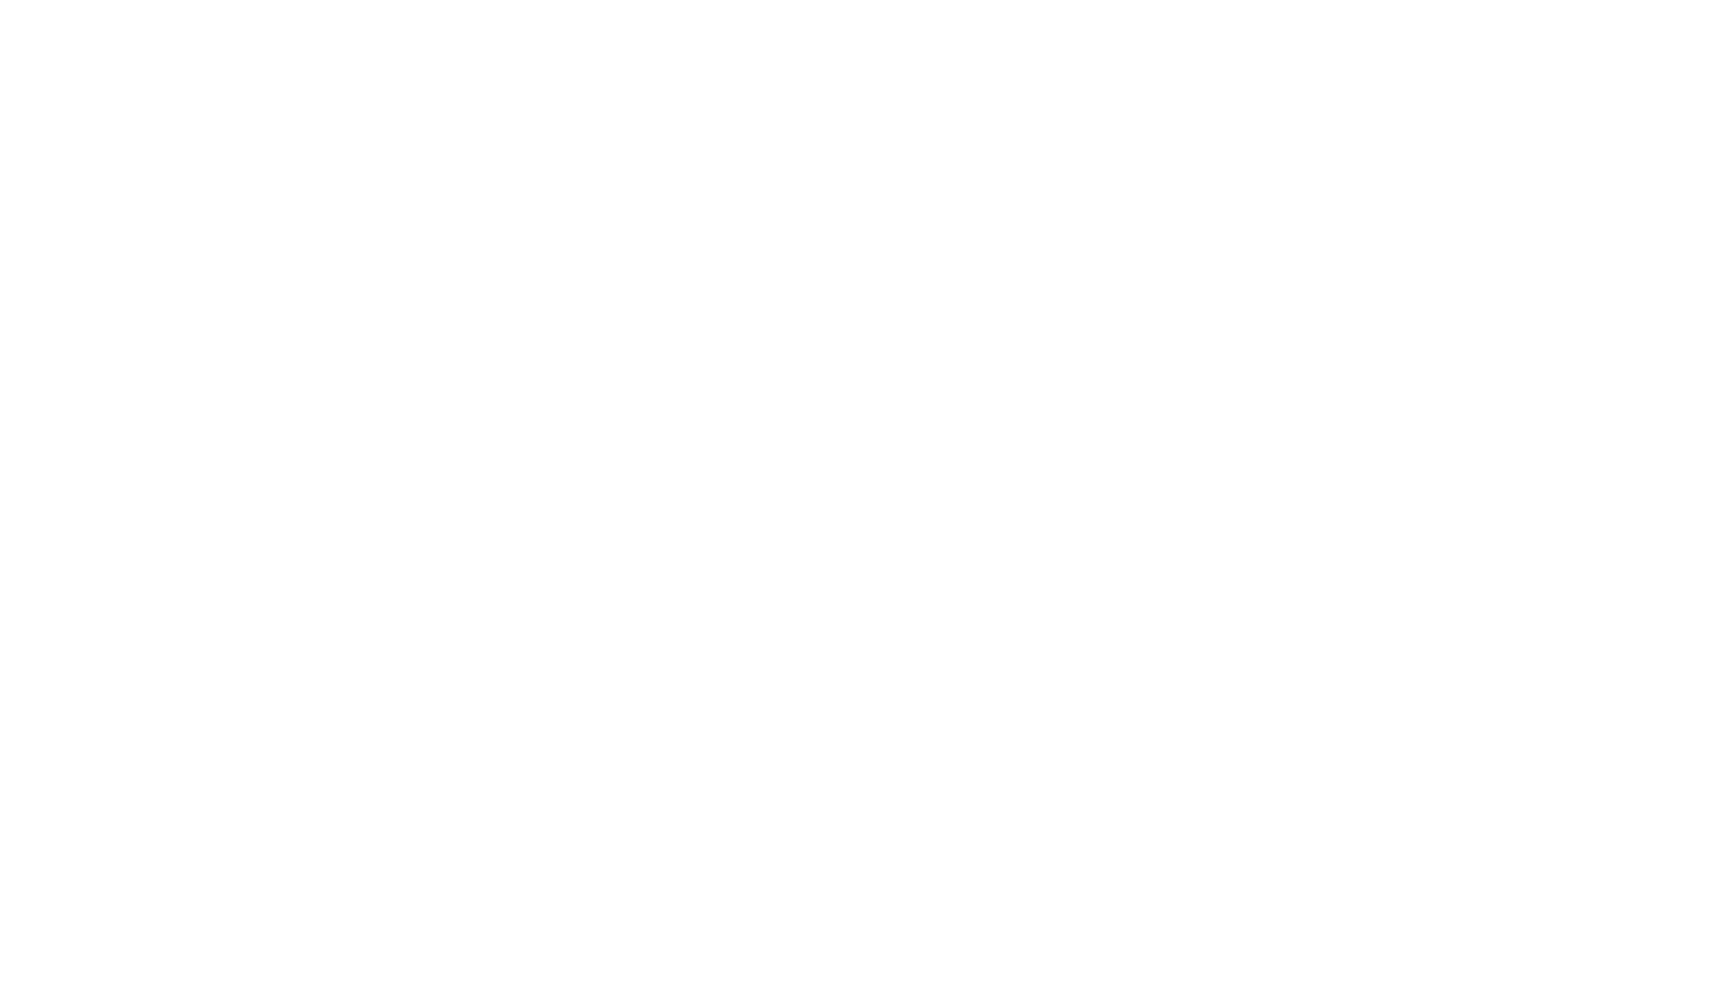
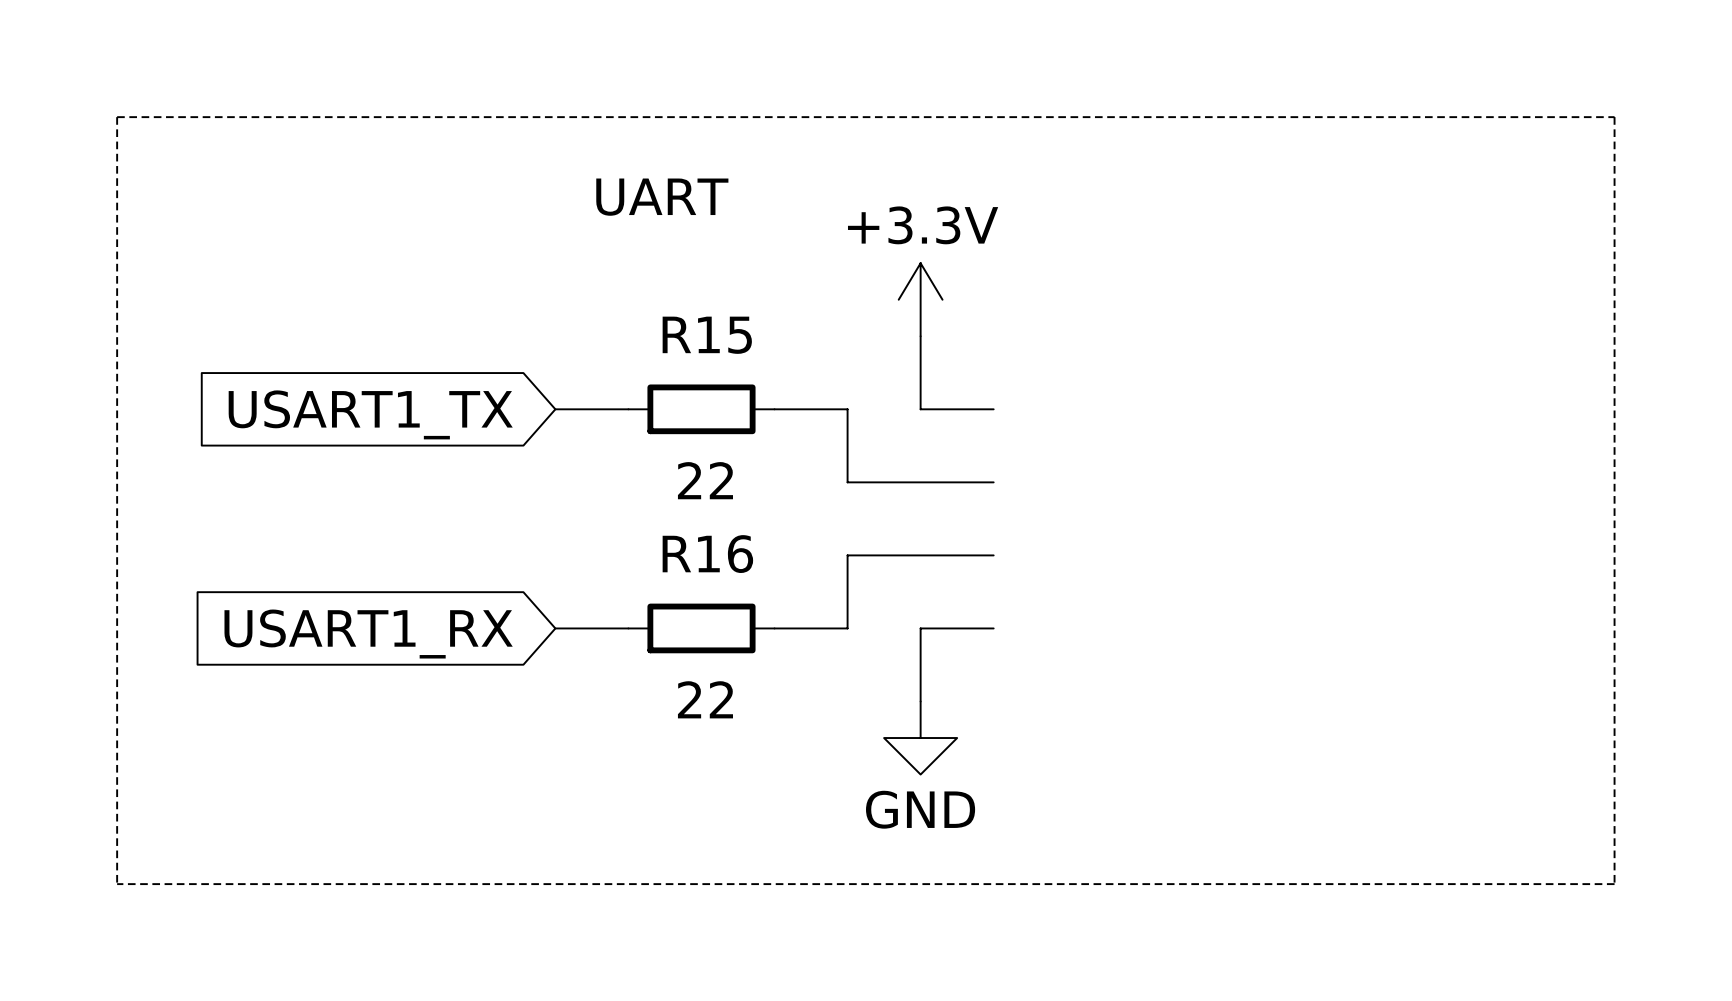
line: none -> (117, 117) (1614, 117) (1614, 884) (117, 884) (117, 117)
text: none -> UART (662, 197)
power symbol: none -> +3.3V (920, 299)
wire: none -> (920, 336) (920, 409) (993, 409)
wire: none -> (555, 409) (628, 409)
R15: none -> 22 (701, 409)
wire: none -> (774, 409) (847, 409) (847, 482) (993, 482)
global label: none -> USART1_TX (370, 414)
wire: none -> (993, 555) (847, 555) (847, 628) (774, 628)
wire: none -> (555, 628) (628, 628)
R16: none -> 22 (701, 628)
wire: none -> (993, 628) (920, 628) (920, 701)
global label: none -> USART1_RX (368, 634)
power symbol: none -> GND (920, 738)

